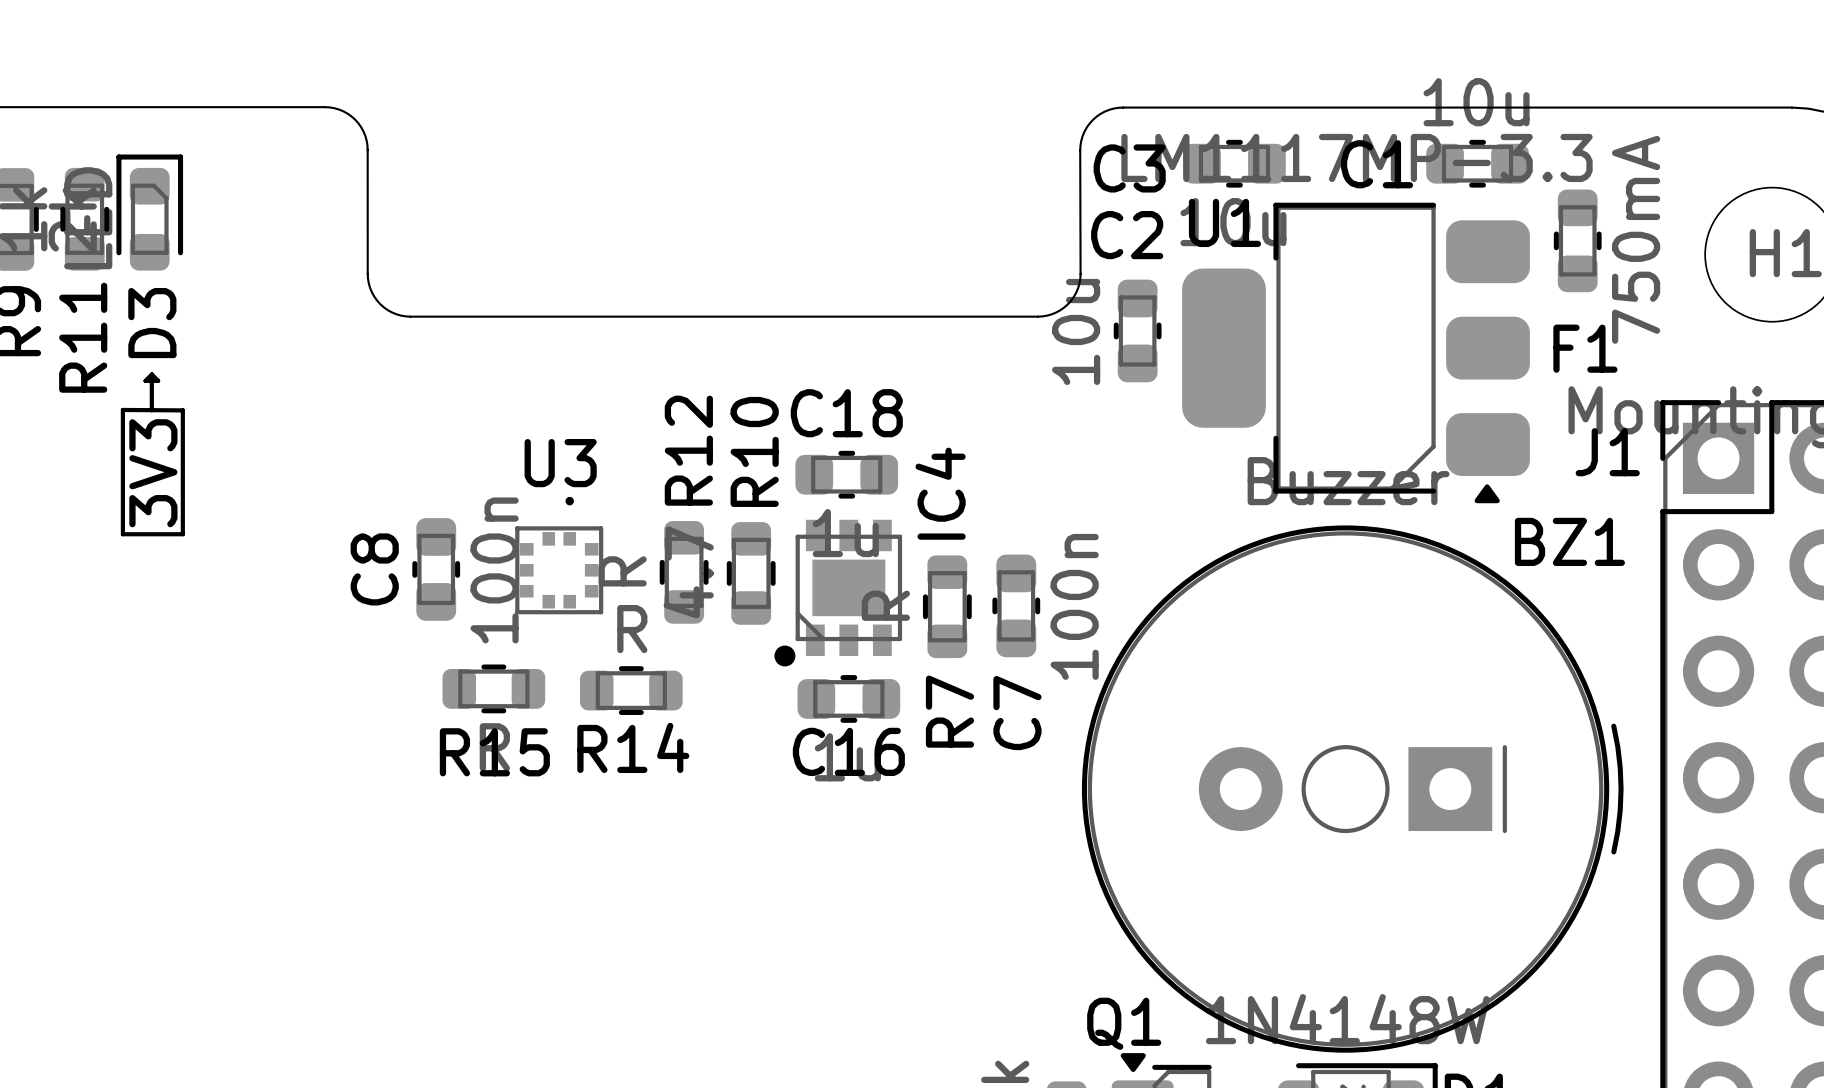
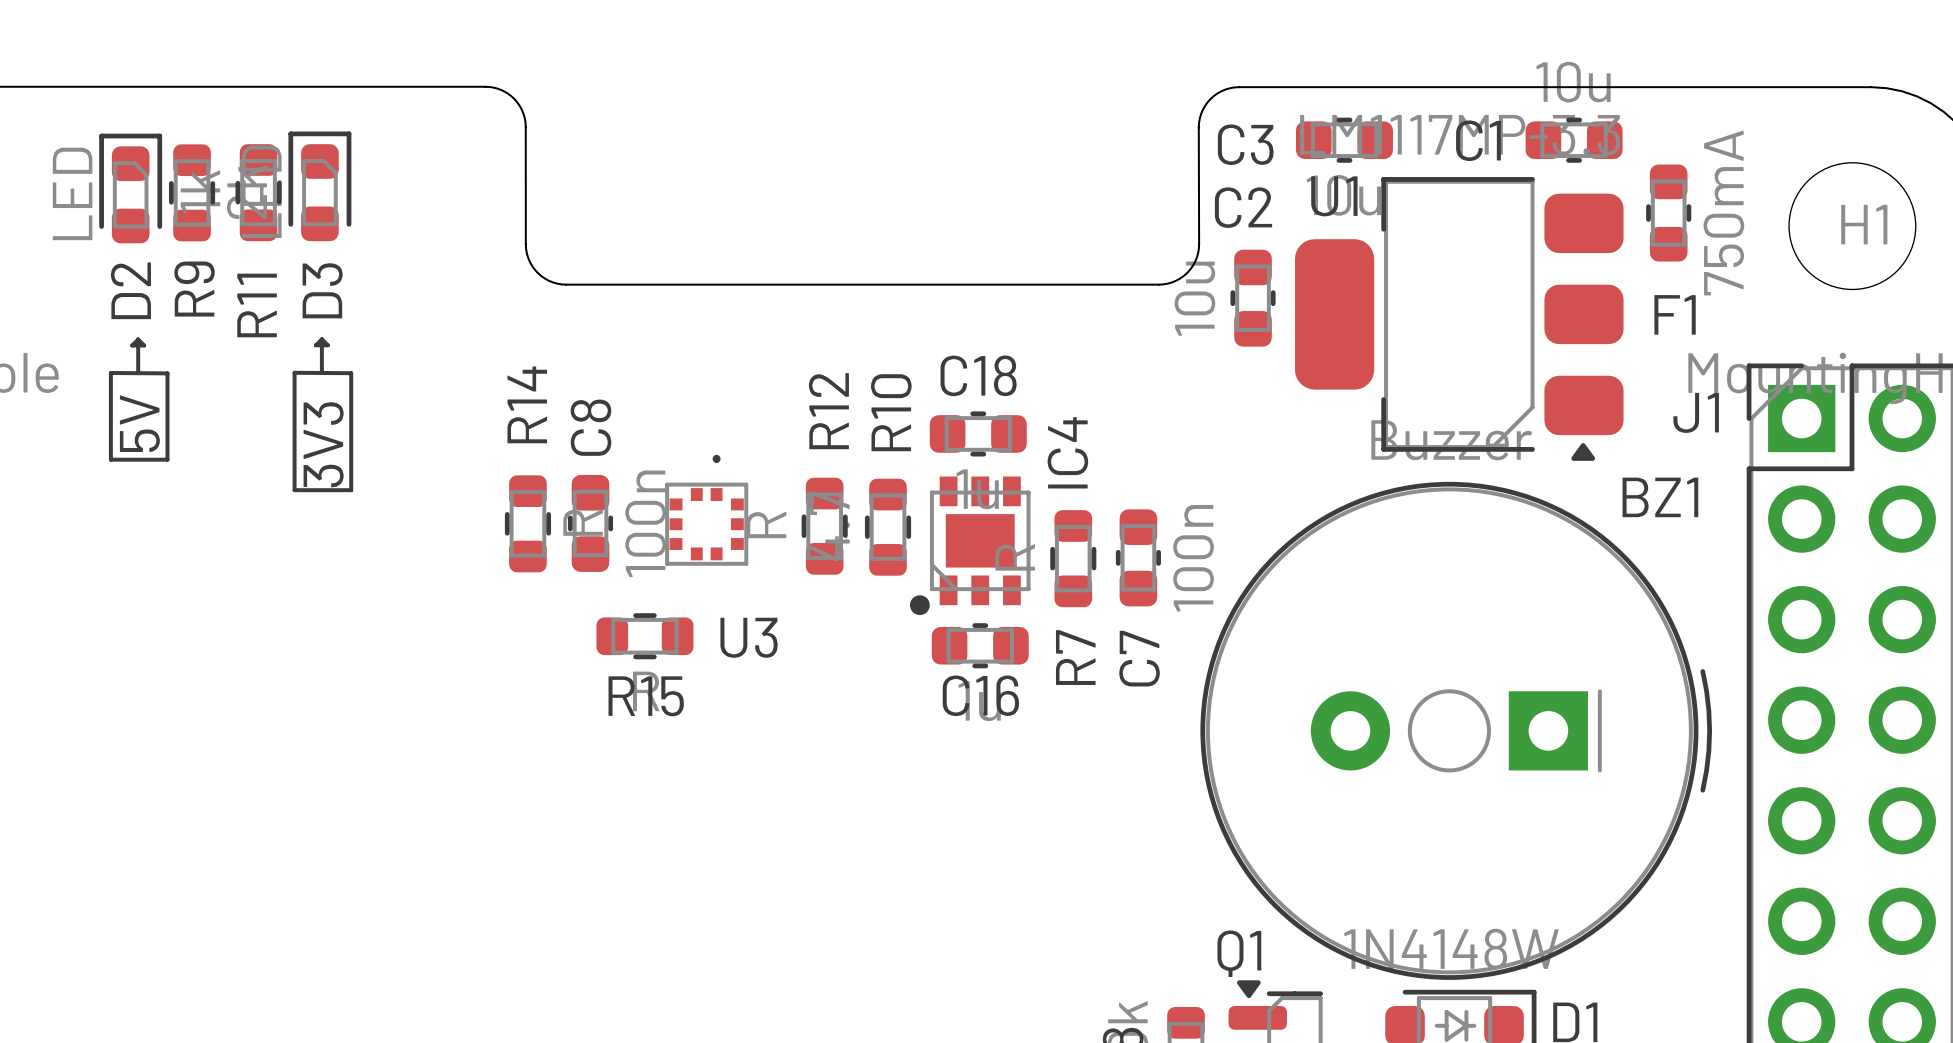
U3 name position: U3 (560, 463) -> U3 (749, 637)
C8 name position: C8 (374, 569) -> C8 (590, 427)
R14 rotation: 0° (631, 690) -> 90° clockwise (527, 523)
R14 position: (631, 690) -> (527, 523)
R14 name position: R14 (633, 747) -> R14 (527, 404)

